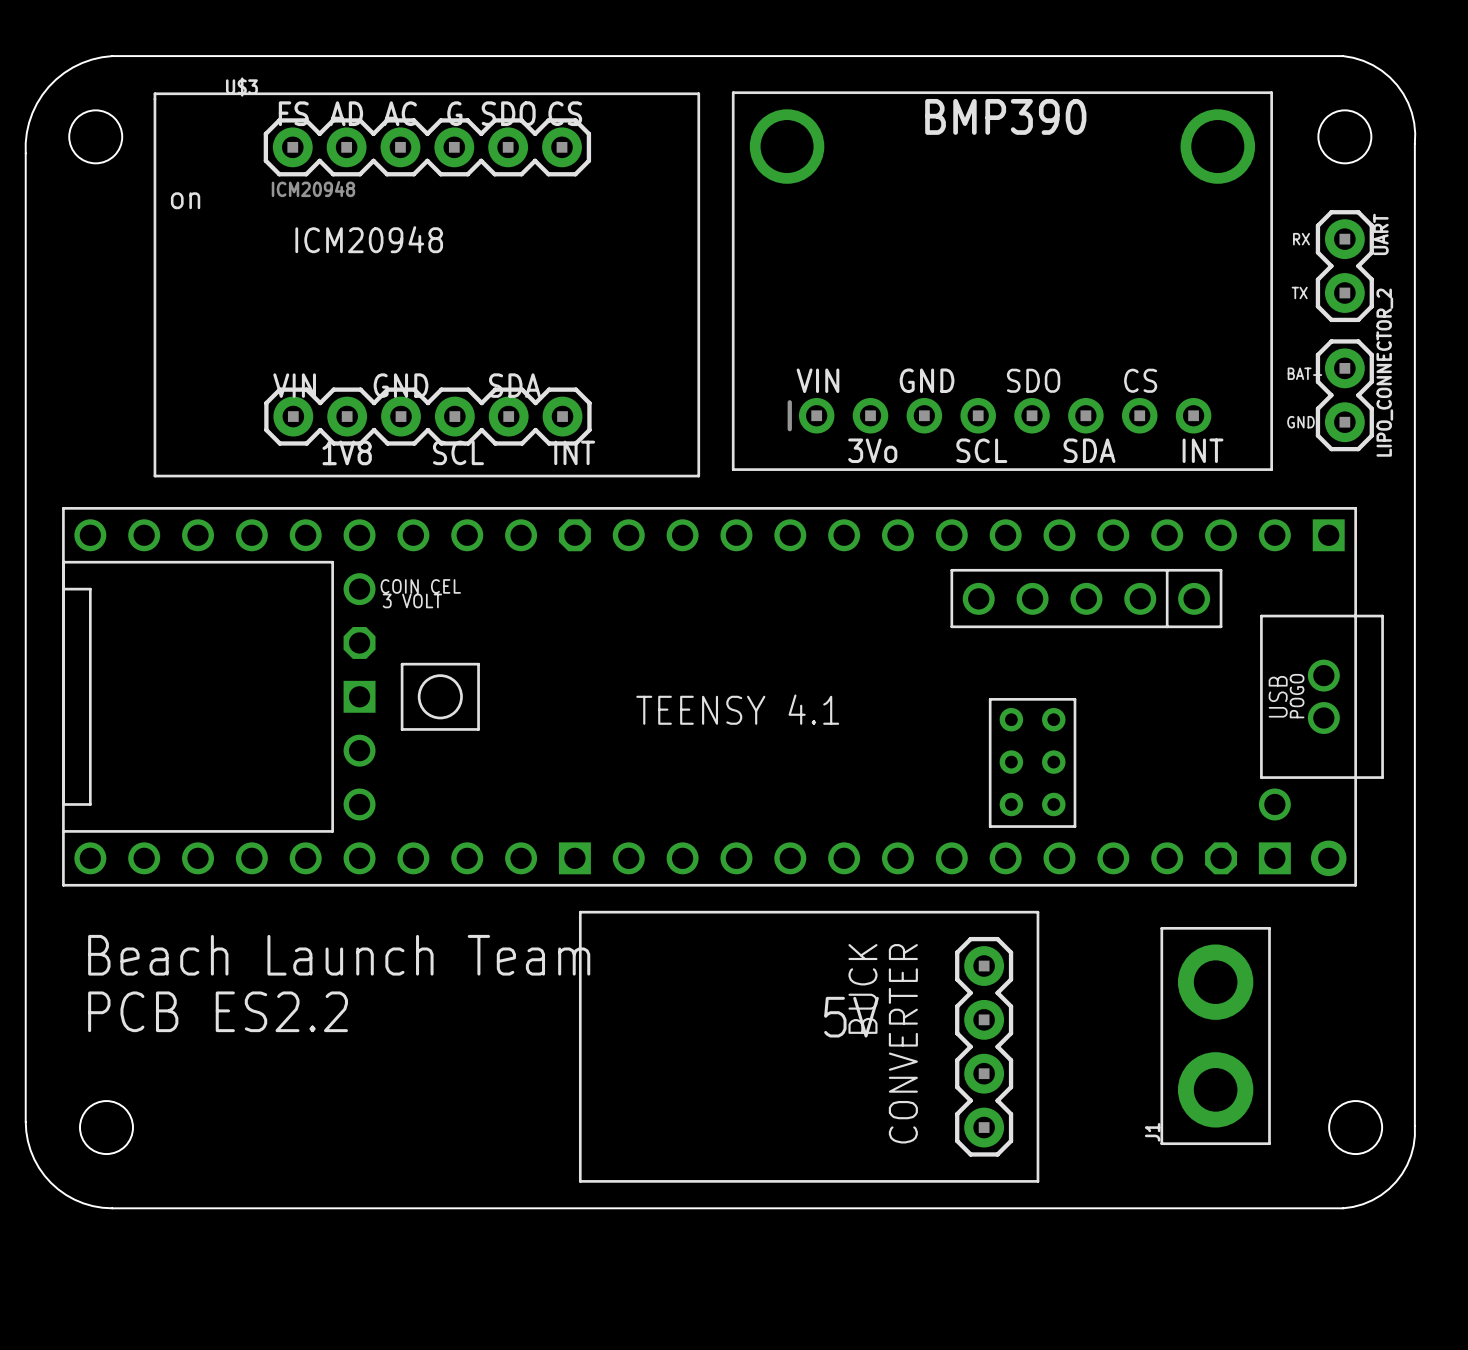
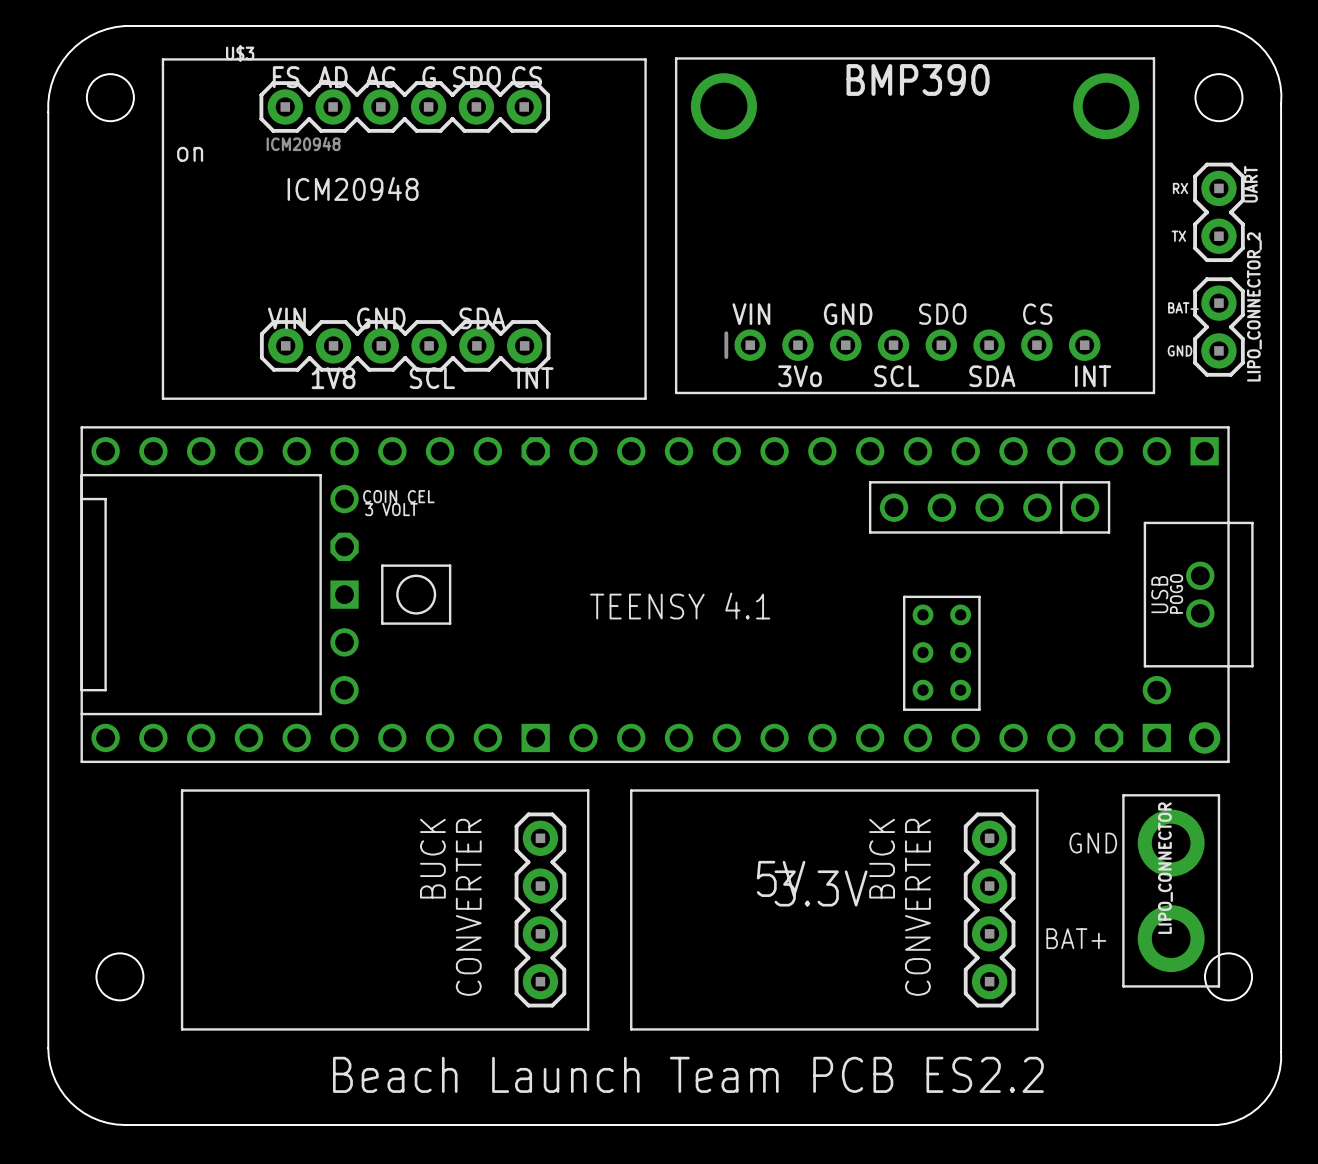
text: Beach Launch Team (339, 955) -> none
text: none -> GND (1093, 843)
text: PCB ES2.2 (218, 1011) -> none
text: none -> 3.3V (821, 888)
LIPO_CONNECTOR: none -> (1171, 890)
J1: (1215, 1036) -> none
part position: (809, 1046) -> (834, 909)
part: none -> (385, 909)
text: none -> BAT+ (1076, 938)
board edge: (25, 1121) (27, 1141) (34, 1159) (51, 1182) (74, 1199) (93, 1206) (112, 1208) (1343, 1208) (1372, 1200) (1396, 1181) (1411, 1155) (1414, 1125) -> (48, 971) (48, 1056) (55, 1081) (70, 1102) (84, 1113) (107, 1123) (125, 1125) (1217, 1125) (1234, 1121) (1251, 1113) (1264, 1101) (1274, 1086) (1281, 1060) (1281, 975)
text: none -> Beach Launch Team PCB ES2.2 (688, 1074)

